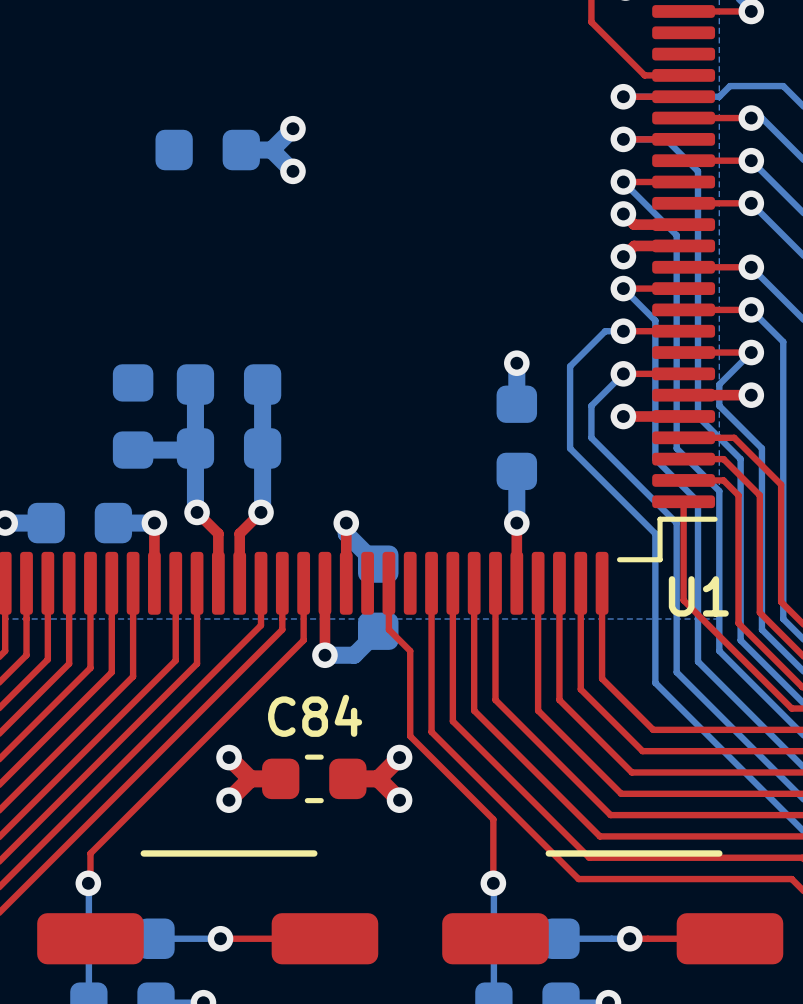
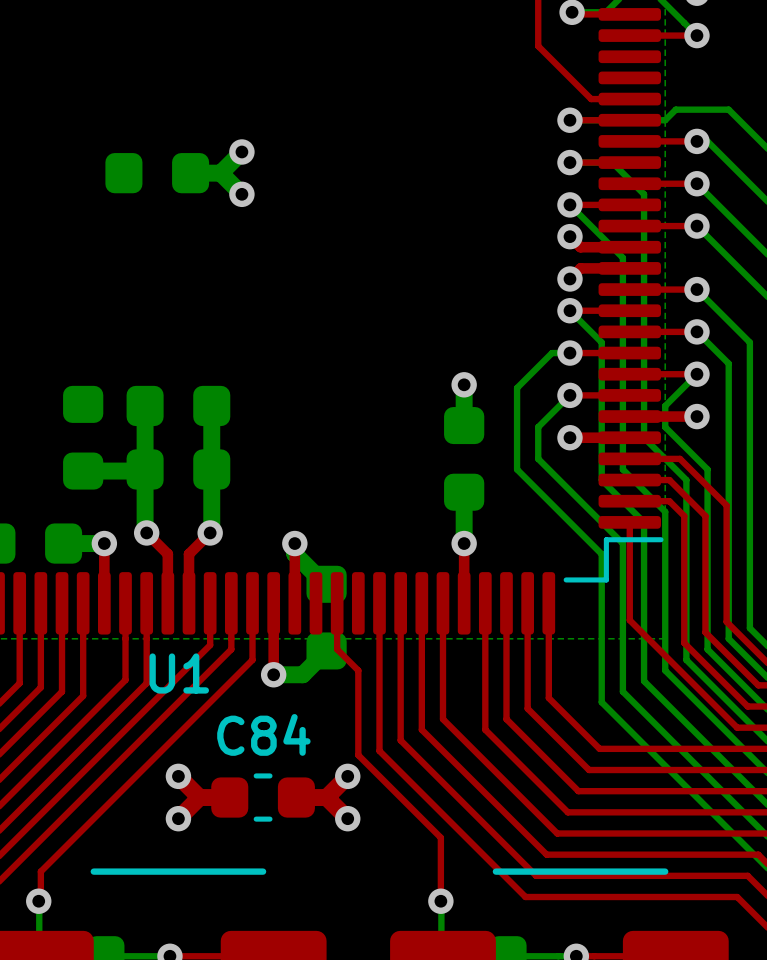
U1 name position: U1 (698, 596) -> U1 (179, 673)

